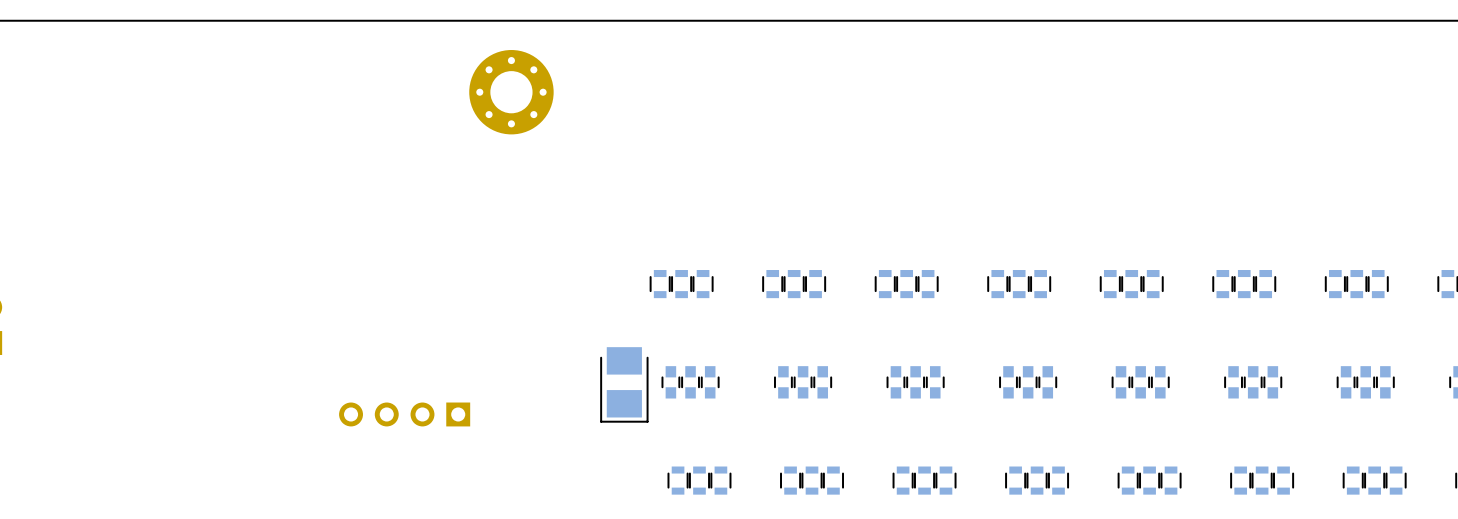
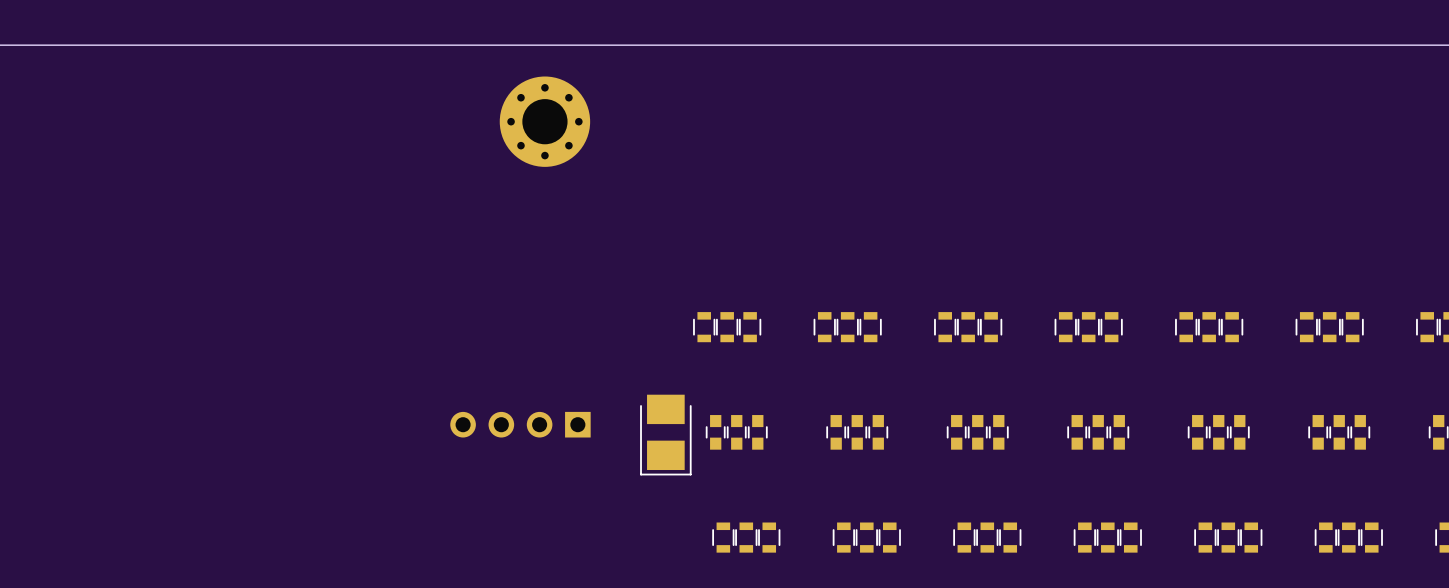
part position: (404, 414) -> (520, 424)

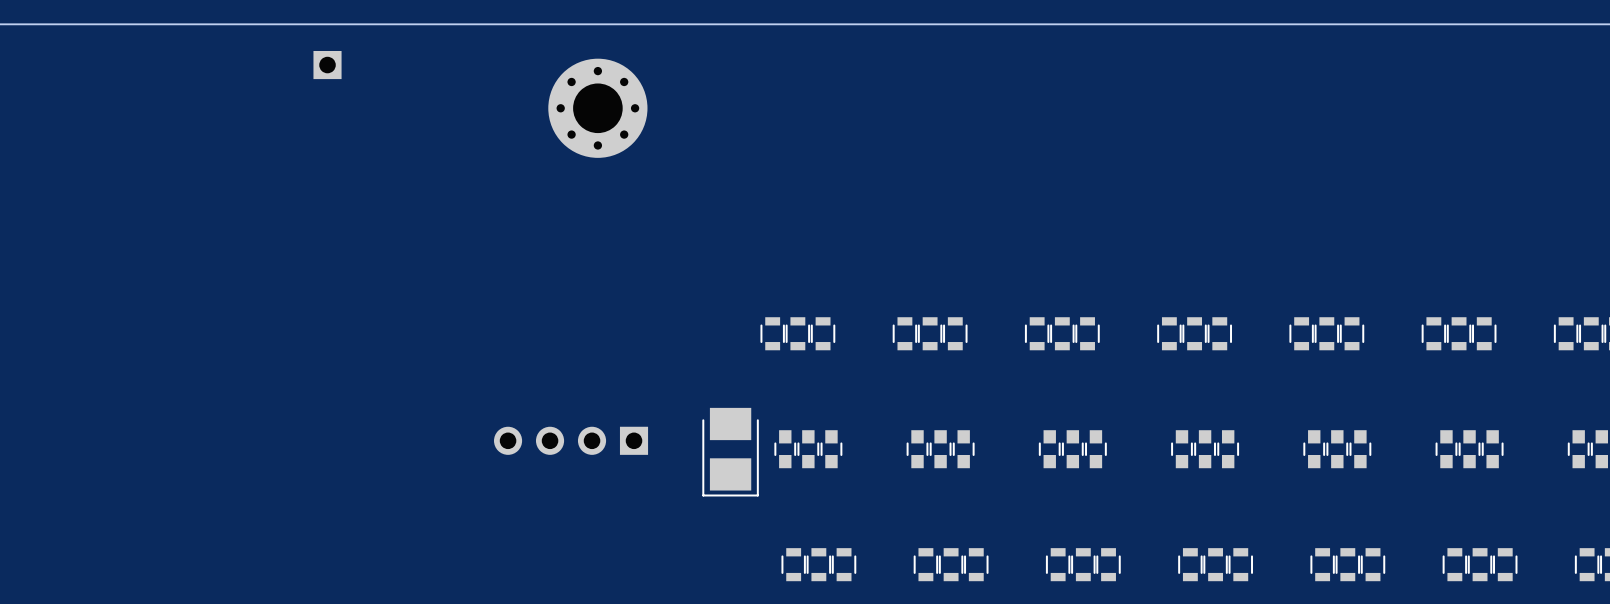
part: none -> (327, 65)

